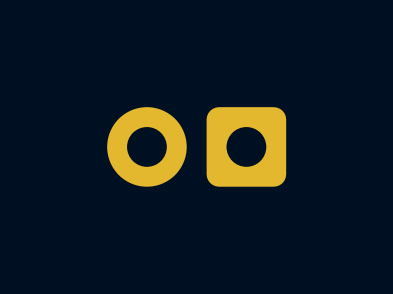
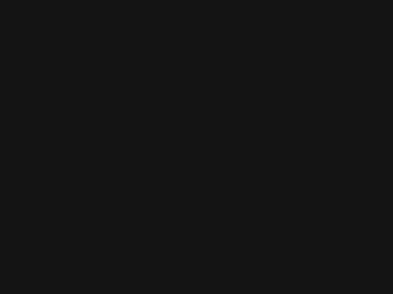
part: (196, 146) -> none

